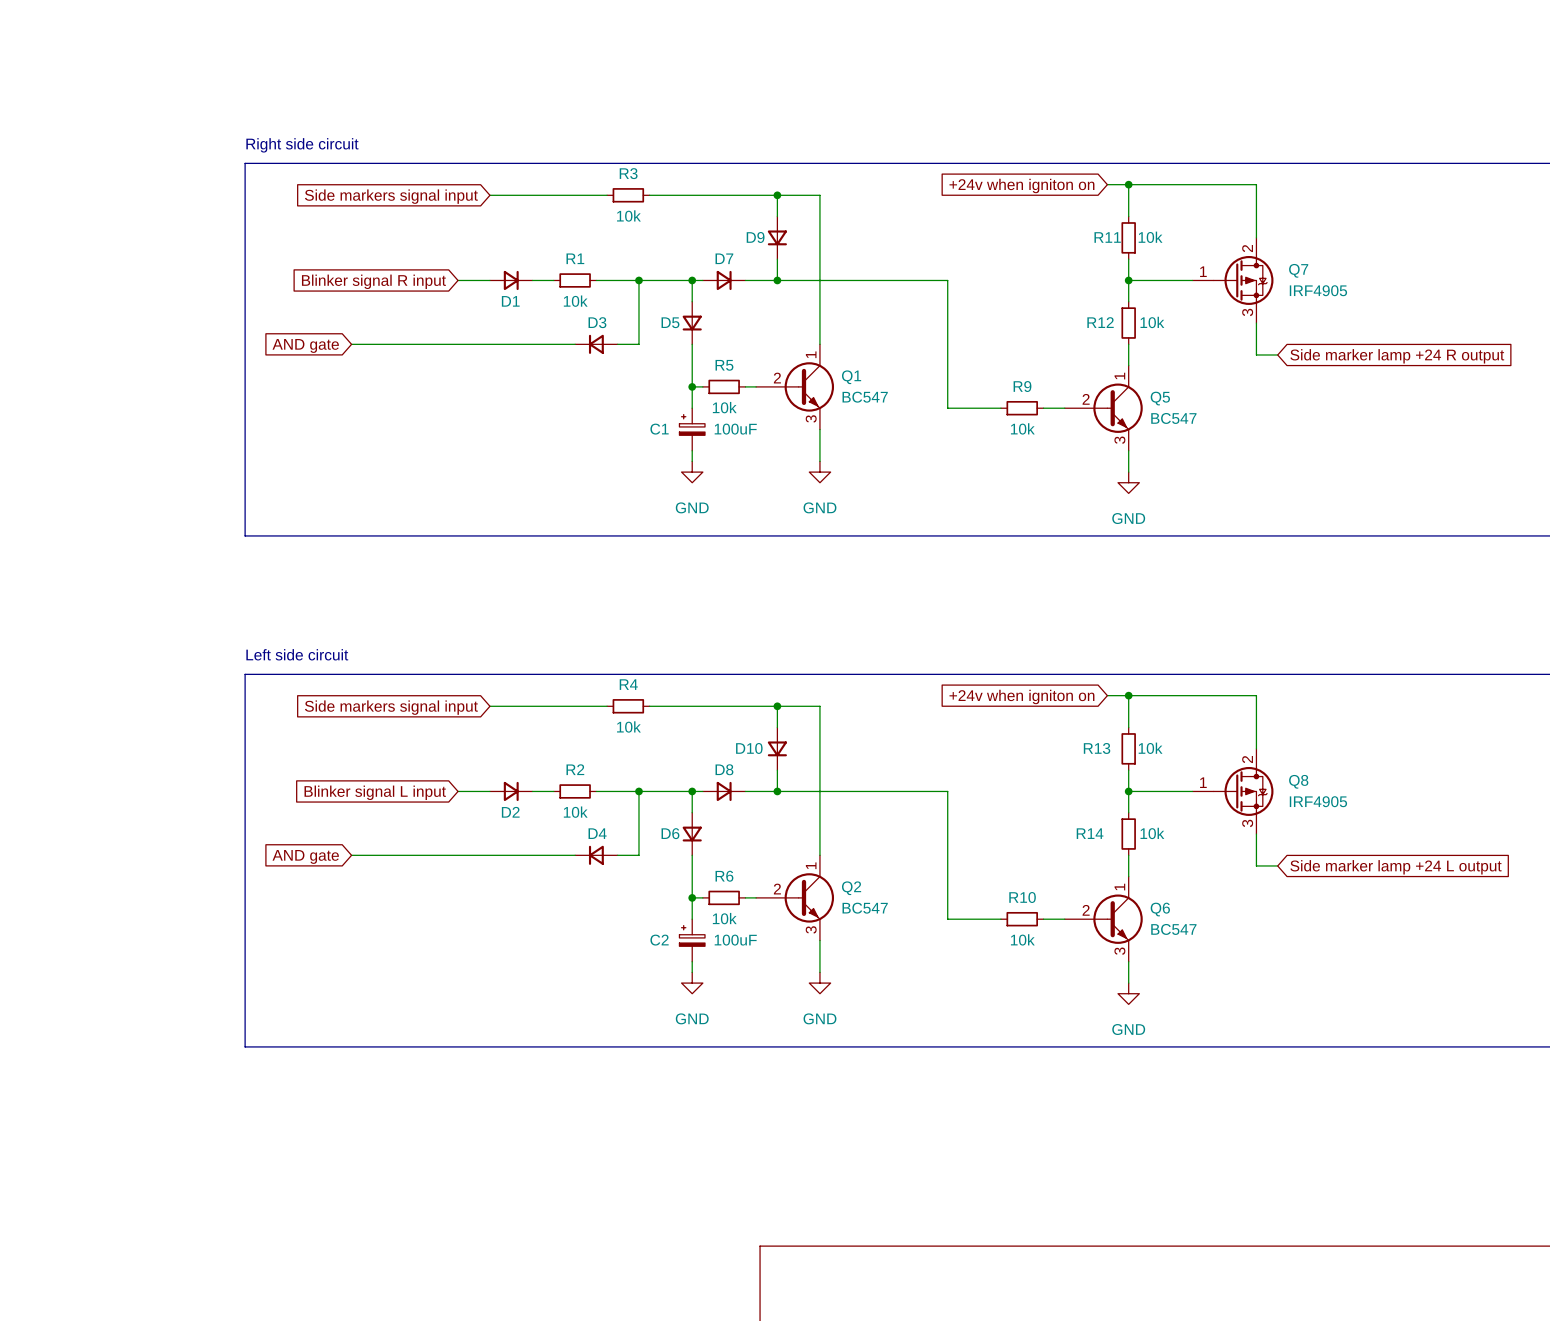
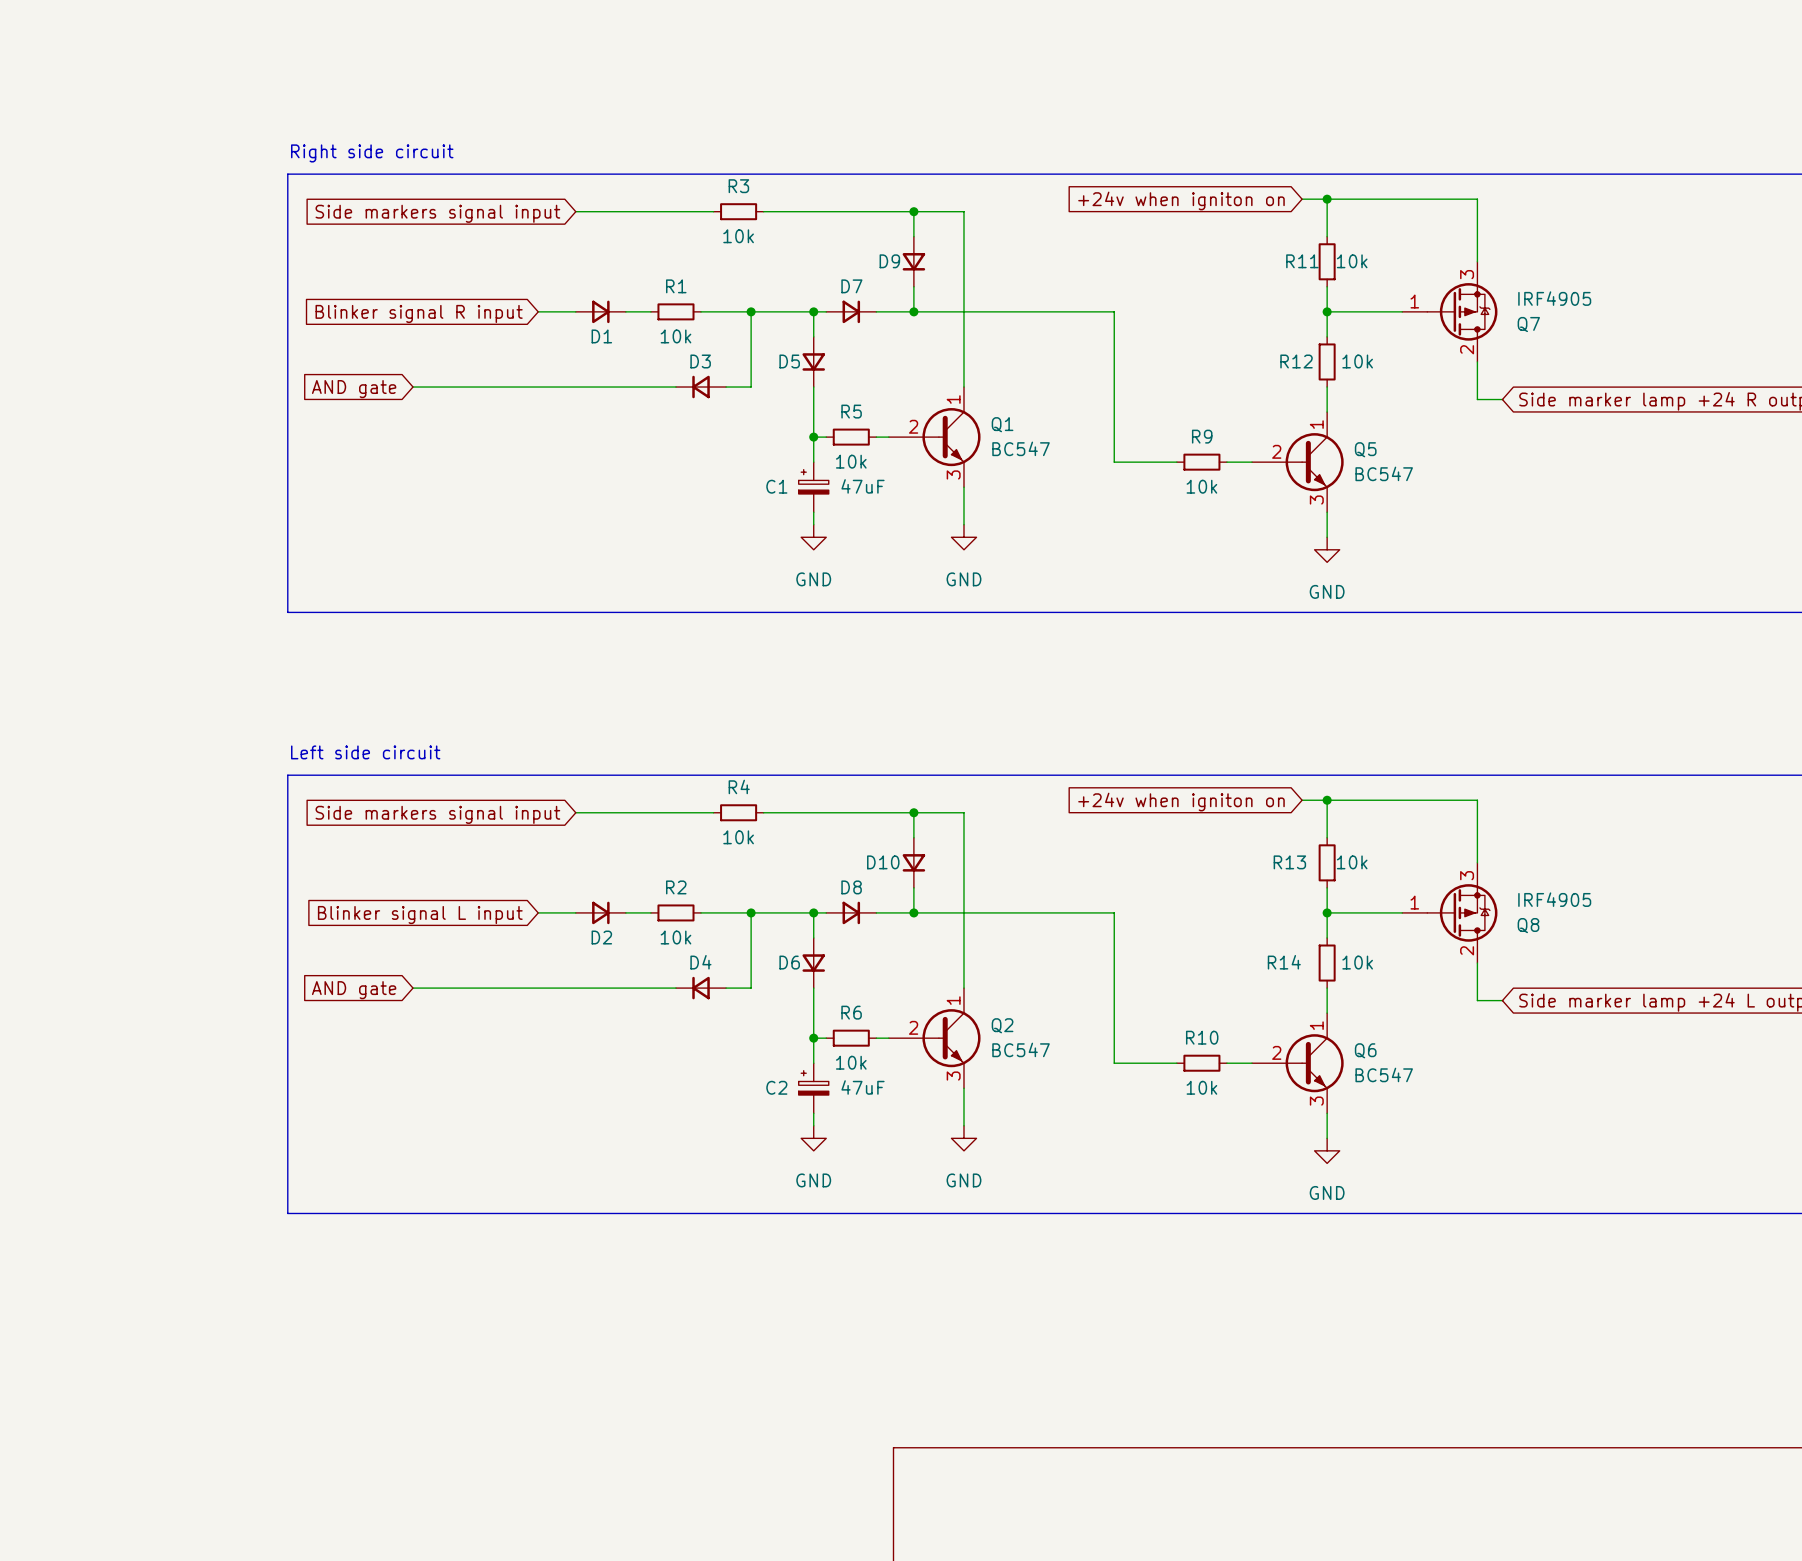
Q7 flip: as is (1243, 280) -> up-down (1462, 311)
C1 value: 100uF (735, 429) -> 47uF (863, 486)
Q8 flip: as is (1243, 791) -> up-down (1462, 912)
C2 value: 100uF (735, 940) -> 47uF (863, 1087)

